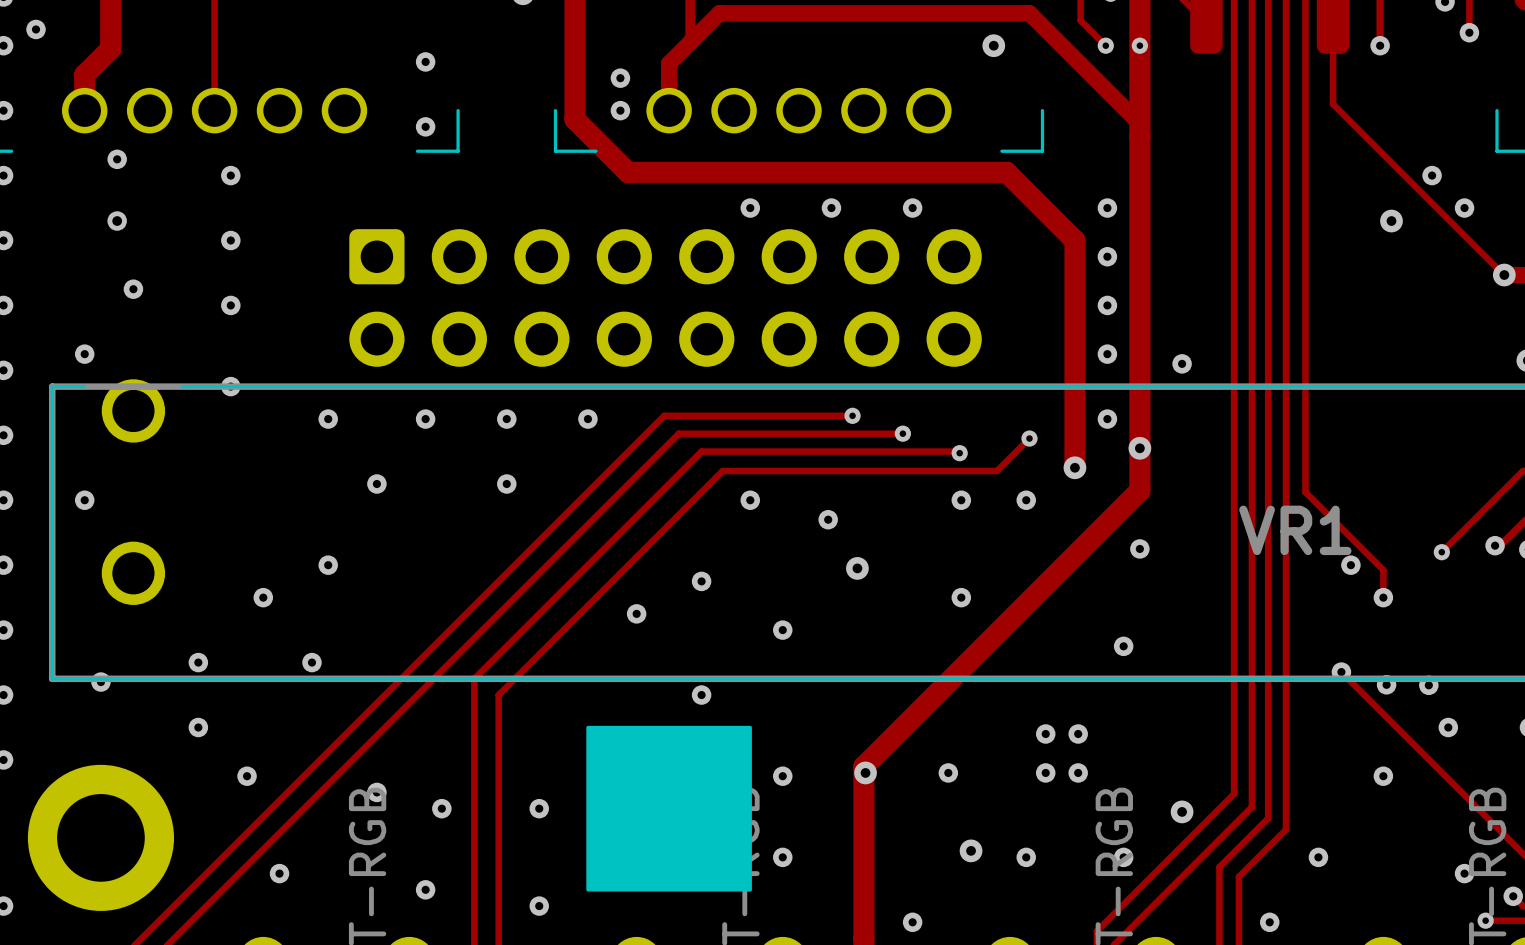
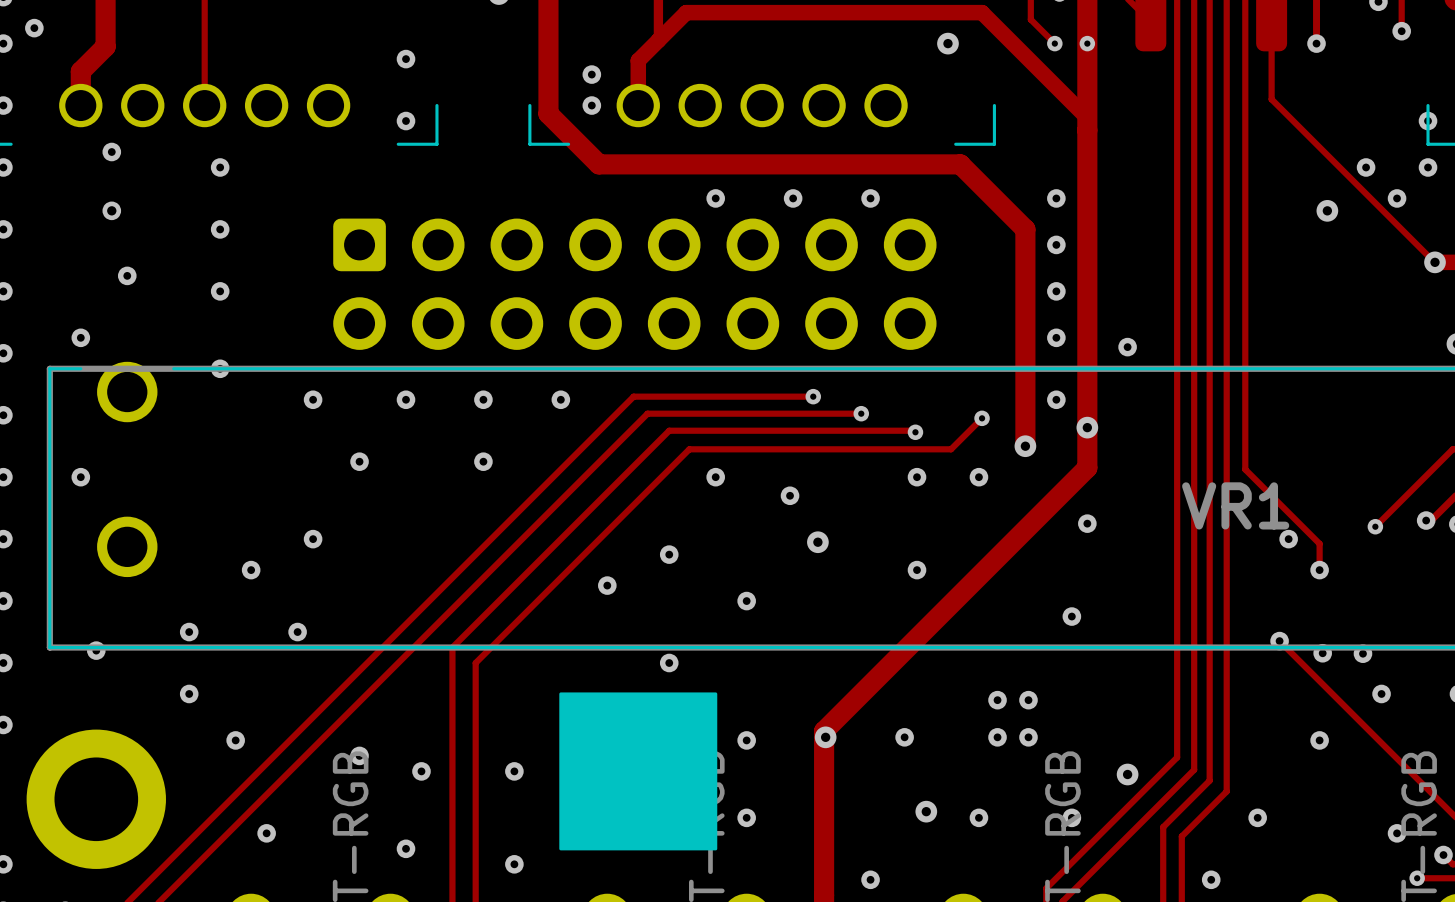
via: none -> (1428, 121)
via: none -> (1428, 167)

